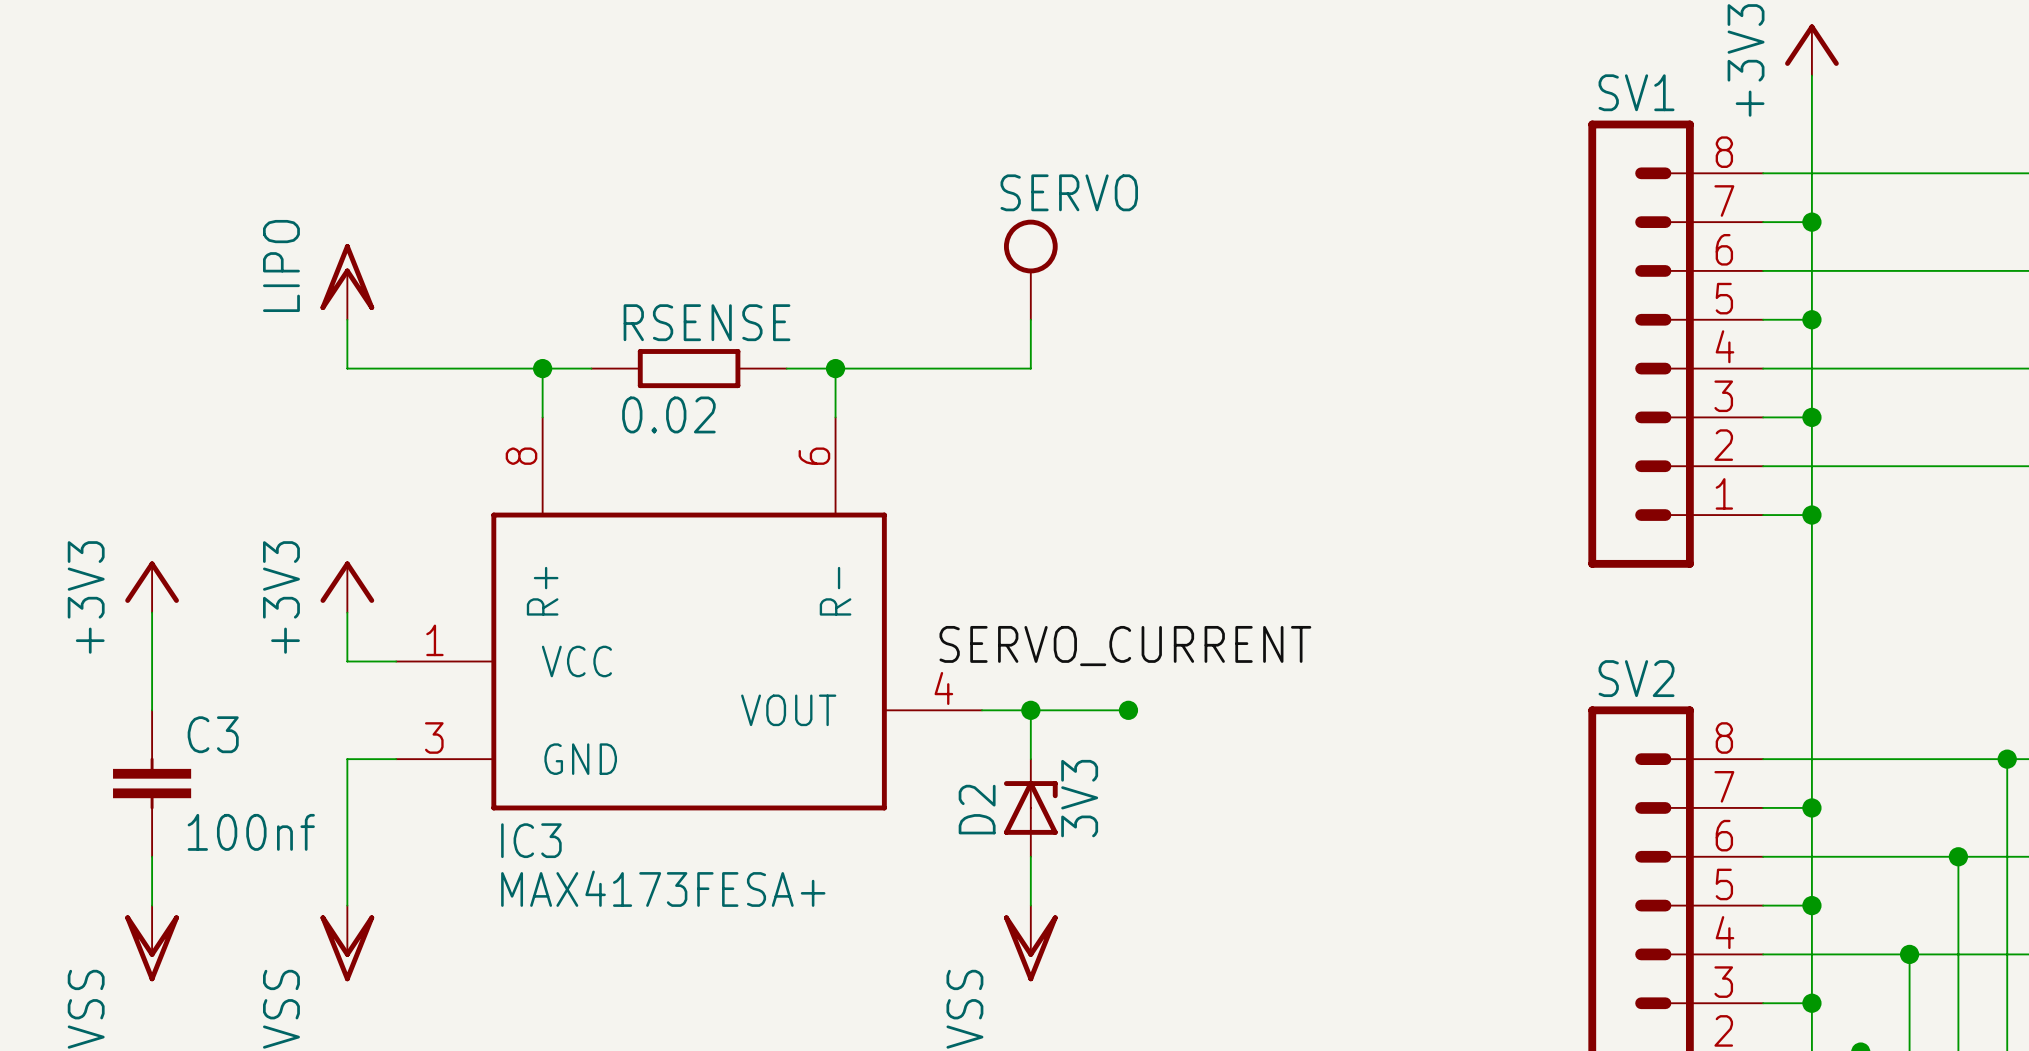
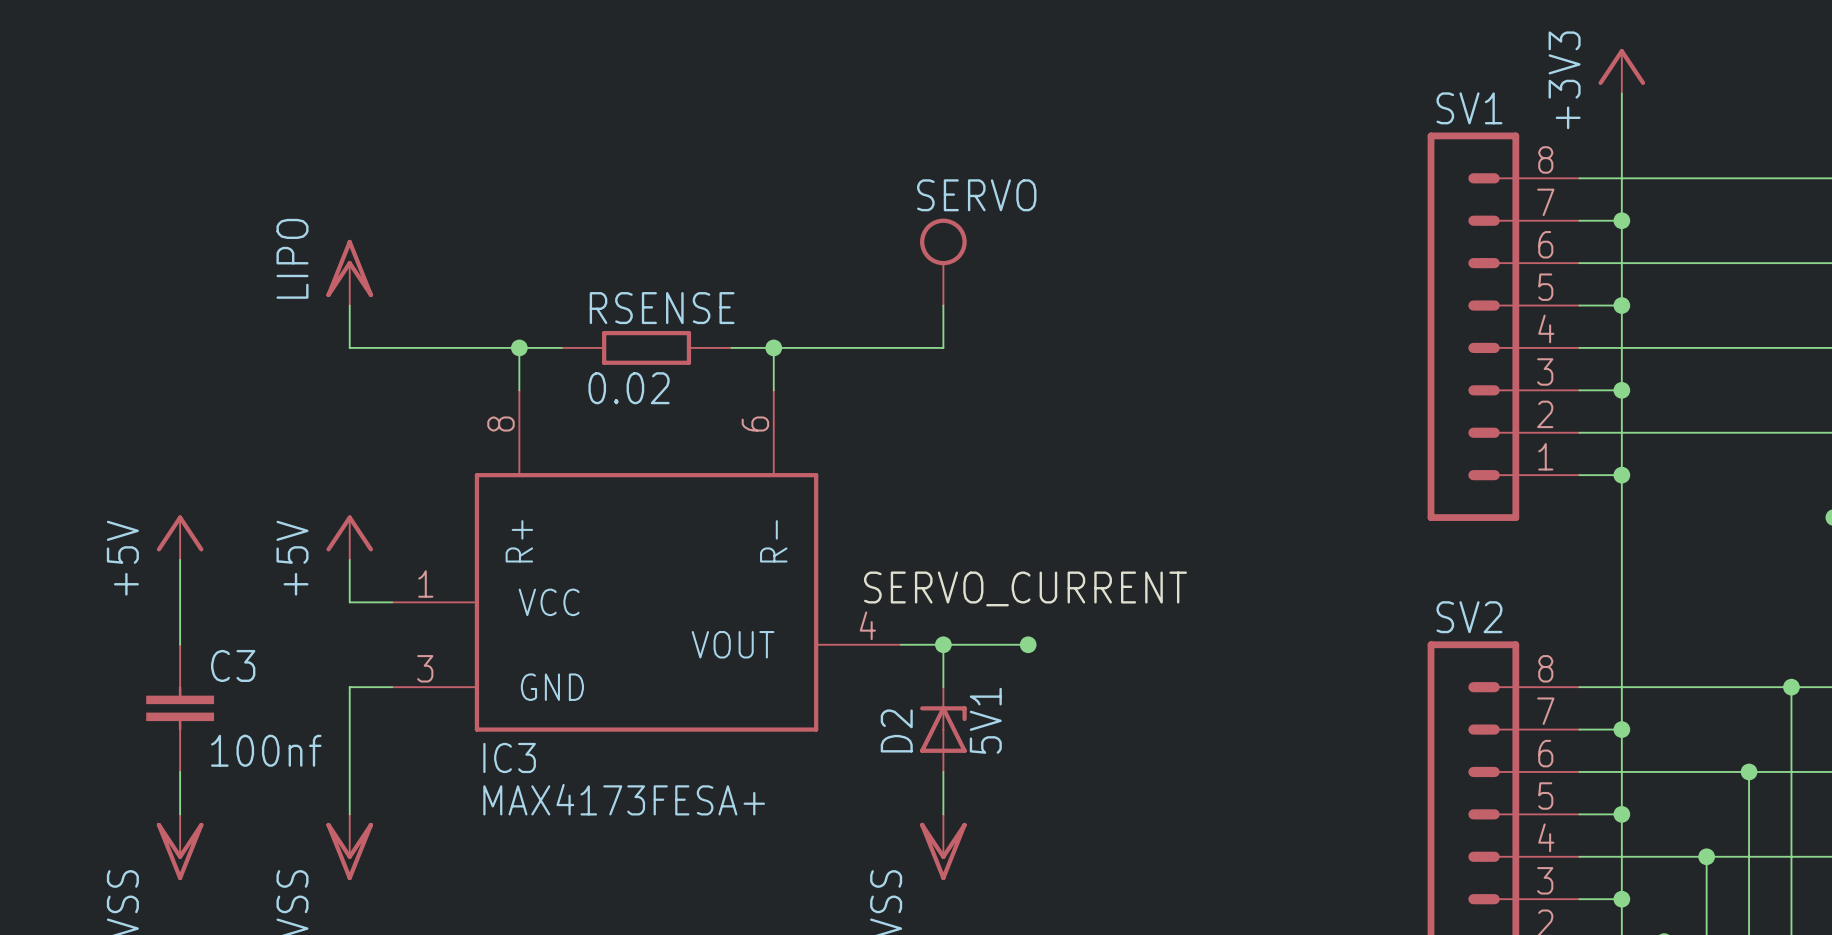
power symbol: +3V3 (152, 587) -> +5V (180, 537)
power symbol: +3V3 (347, 587) -> +5V (349, 537)
D2 value: 3V3 (1079, 798) -> 5V1 (985, 720)

